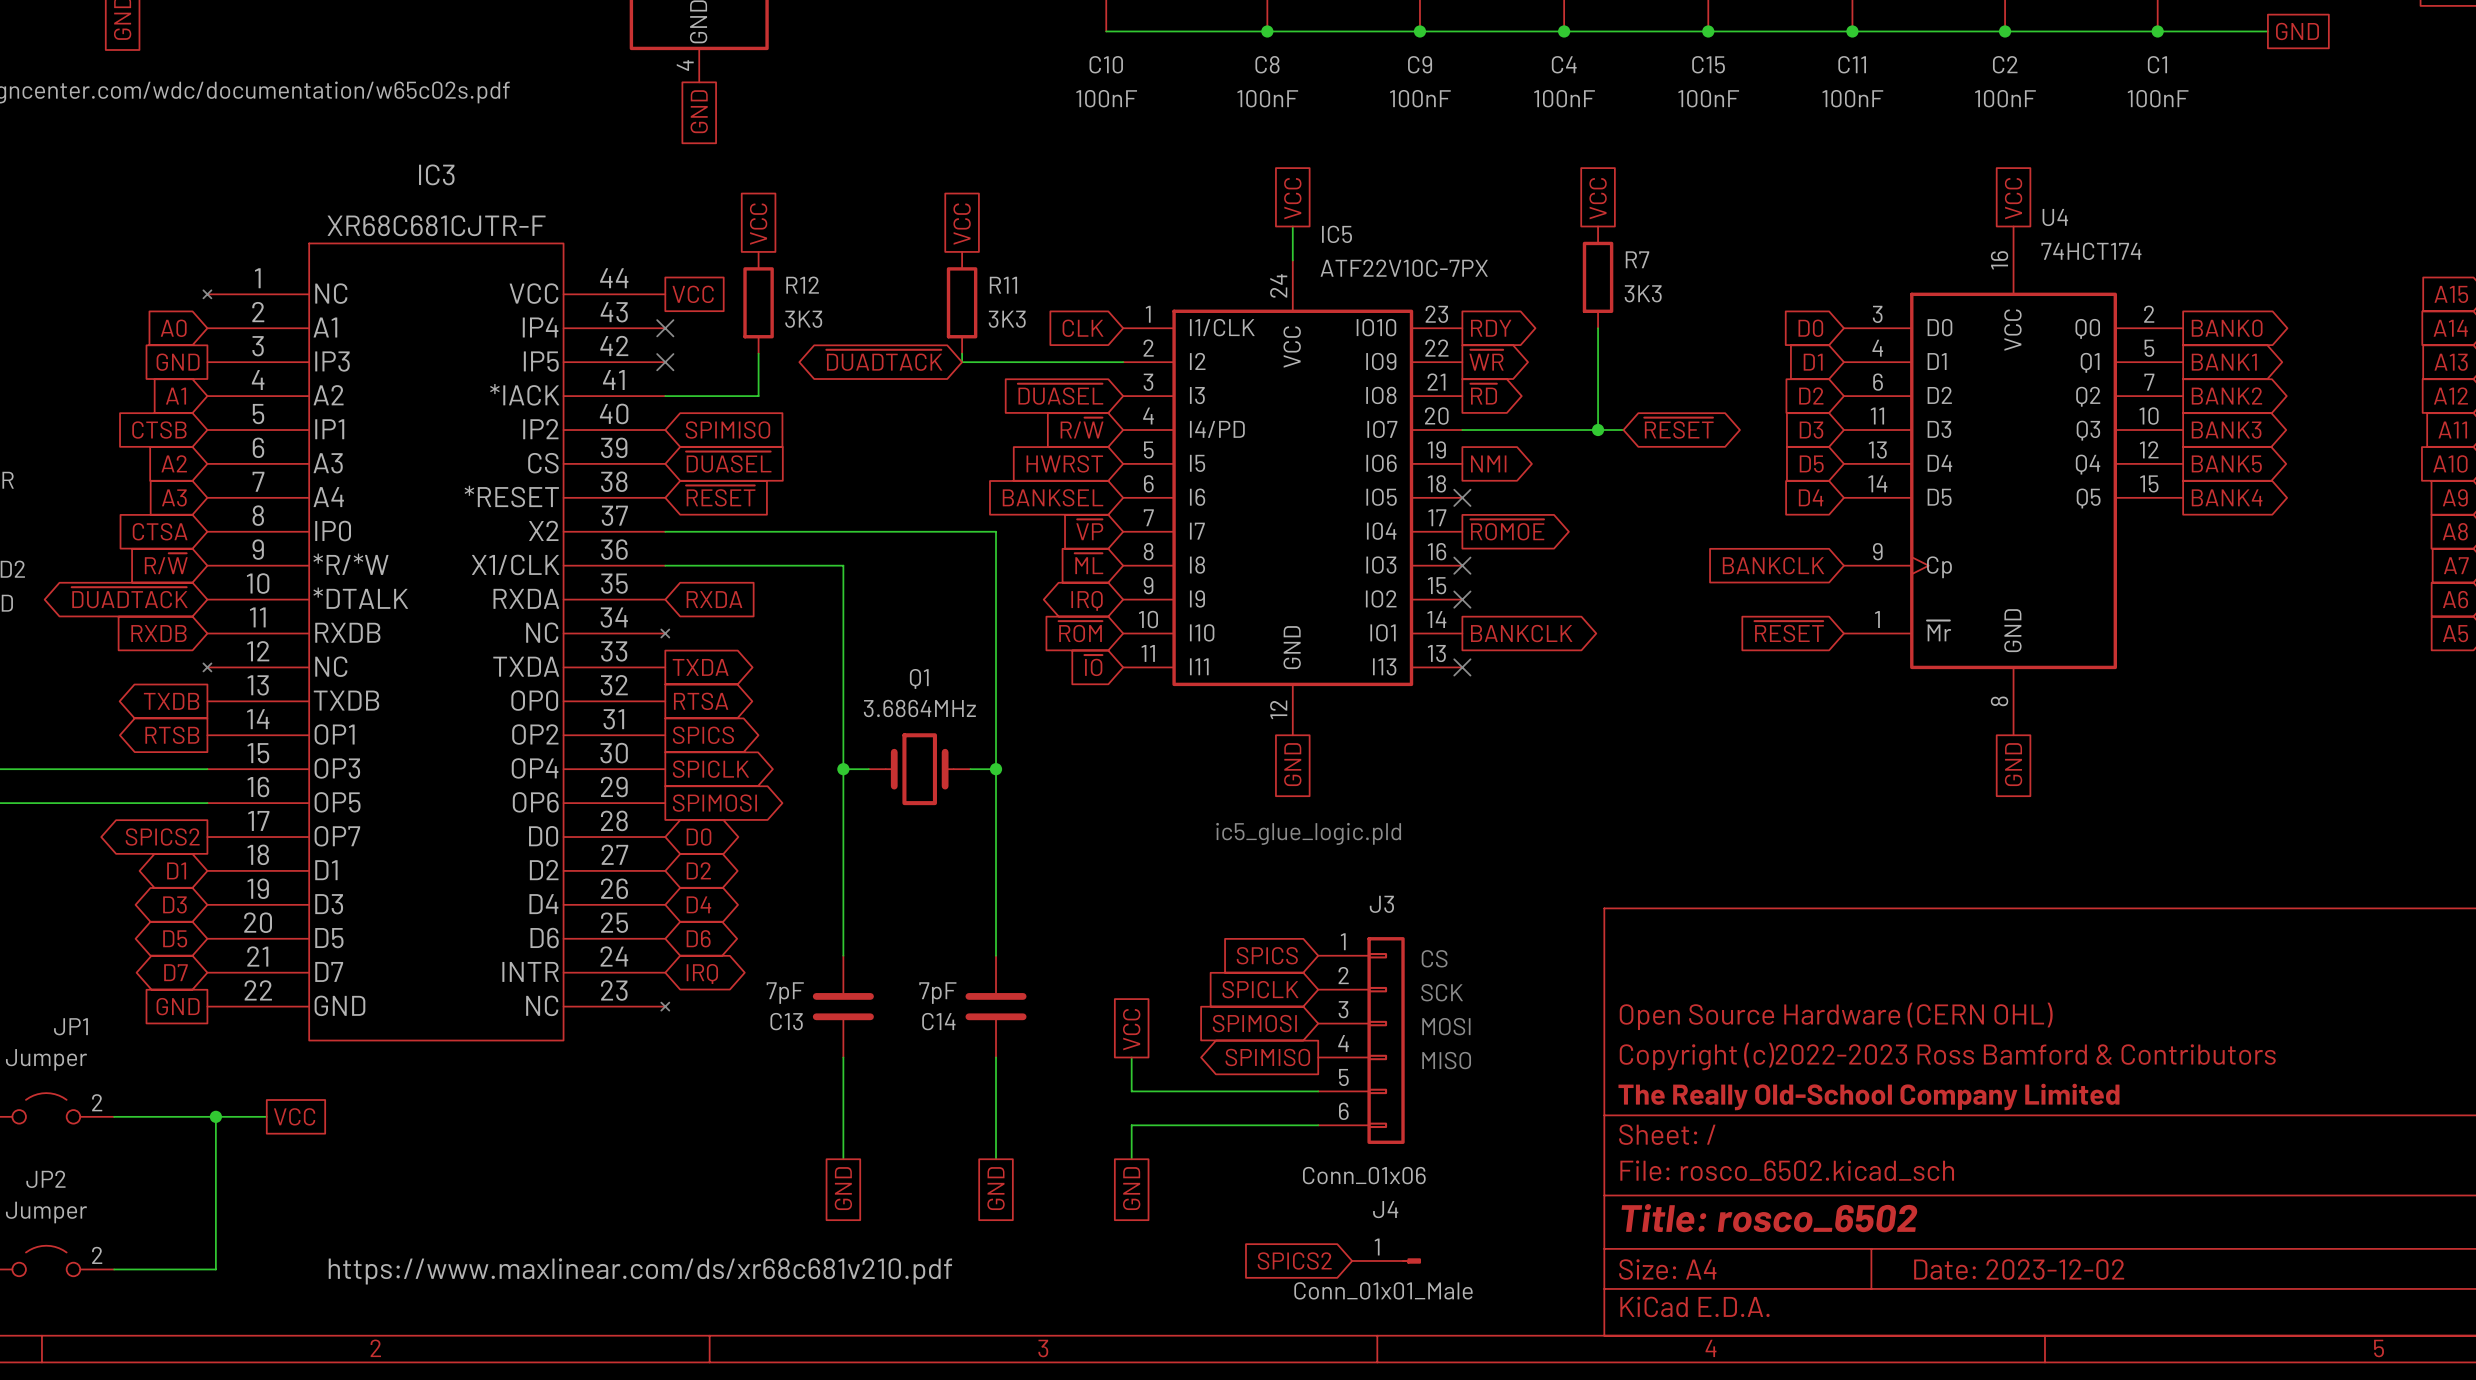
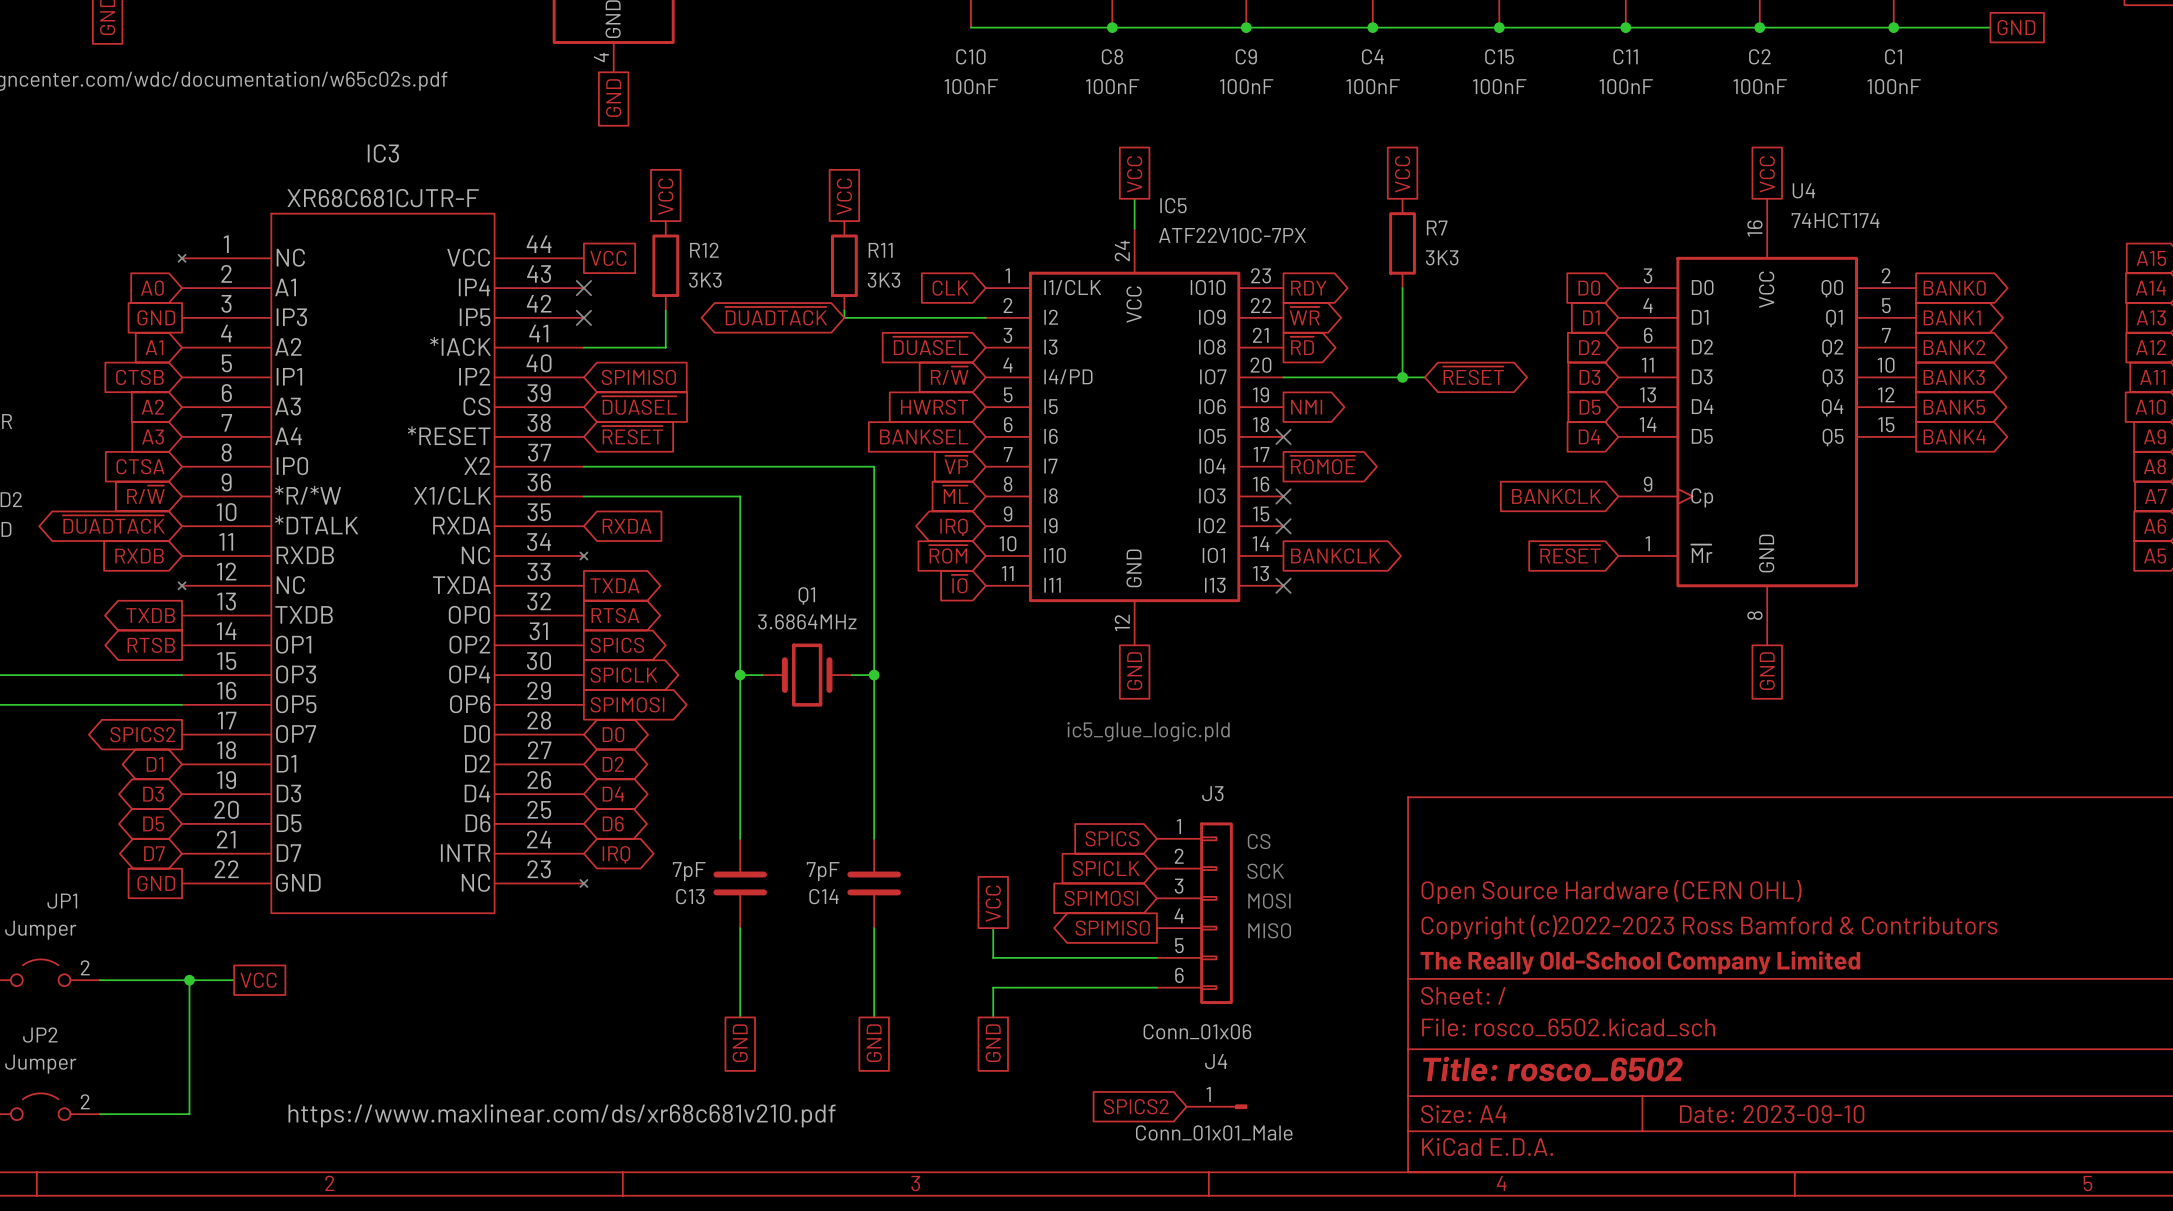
title block: Date: 2023-12-02 (2019, 1269) -> Date: 2023-09-10 (1772, 1114)

